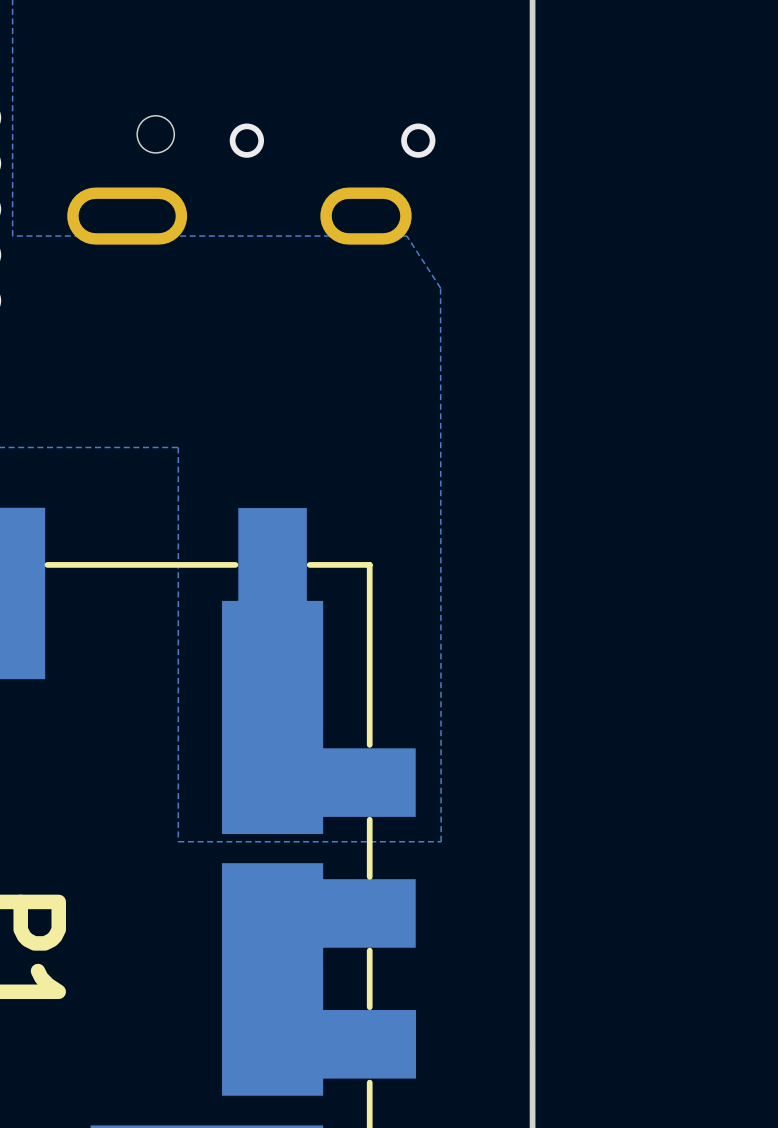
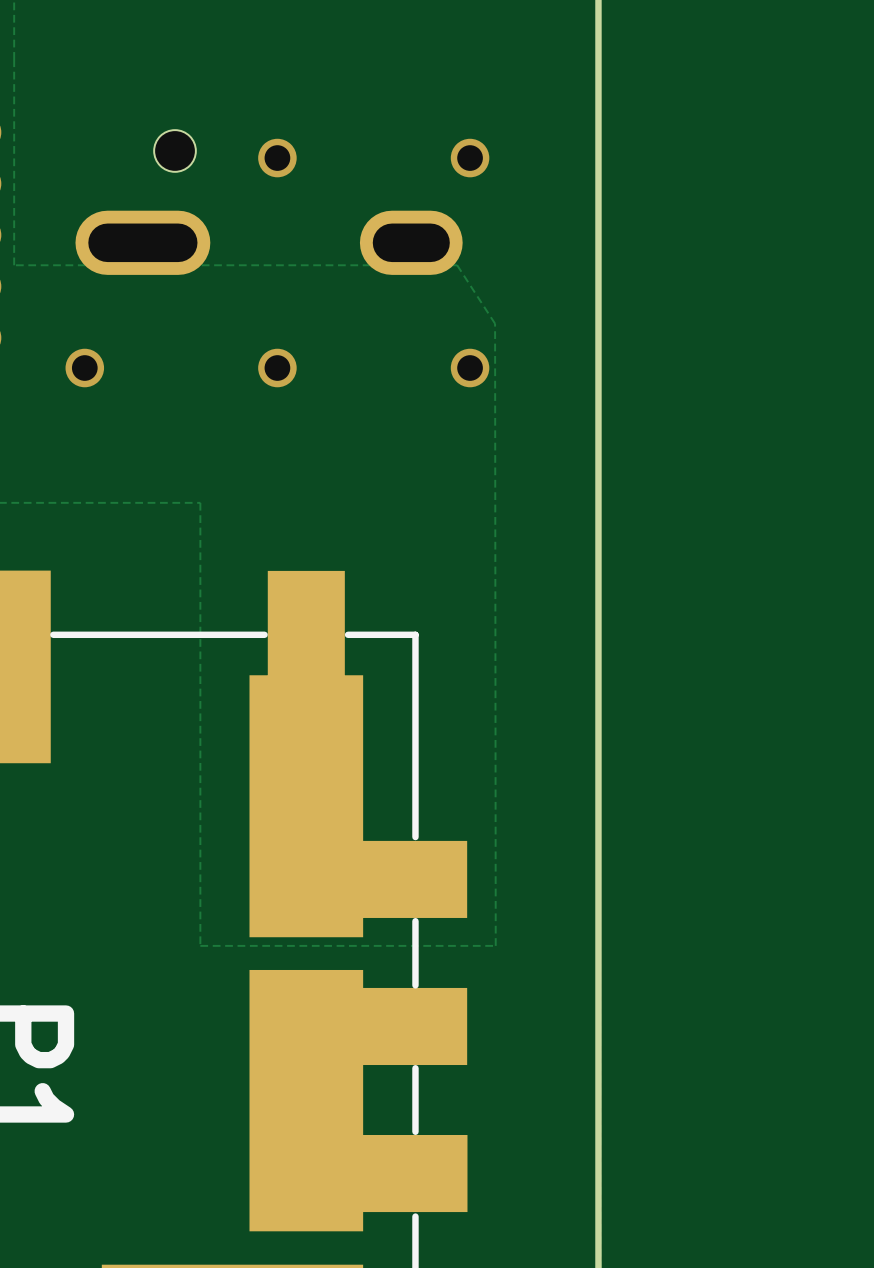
via: none -> (84, 368)
via: none -> (277, 368)
via: none -> (470, 368)

